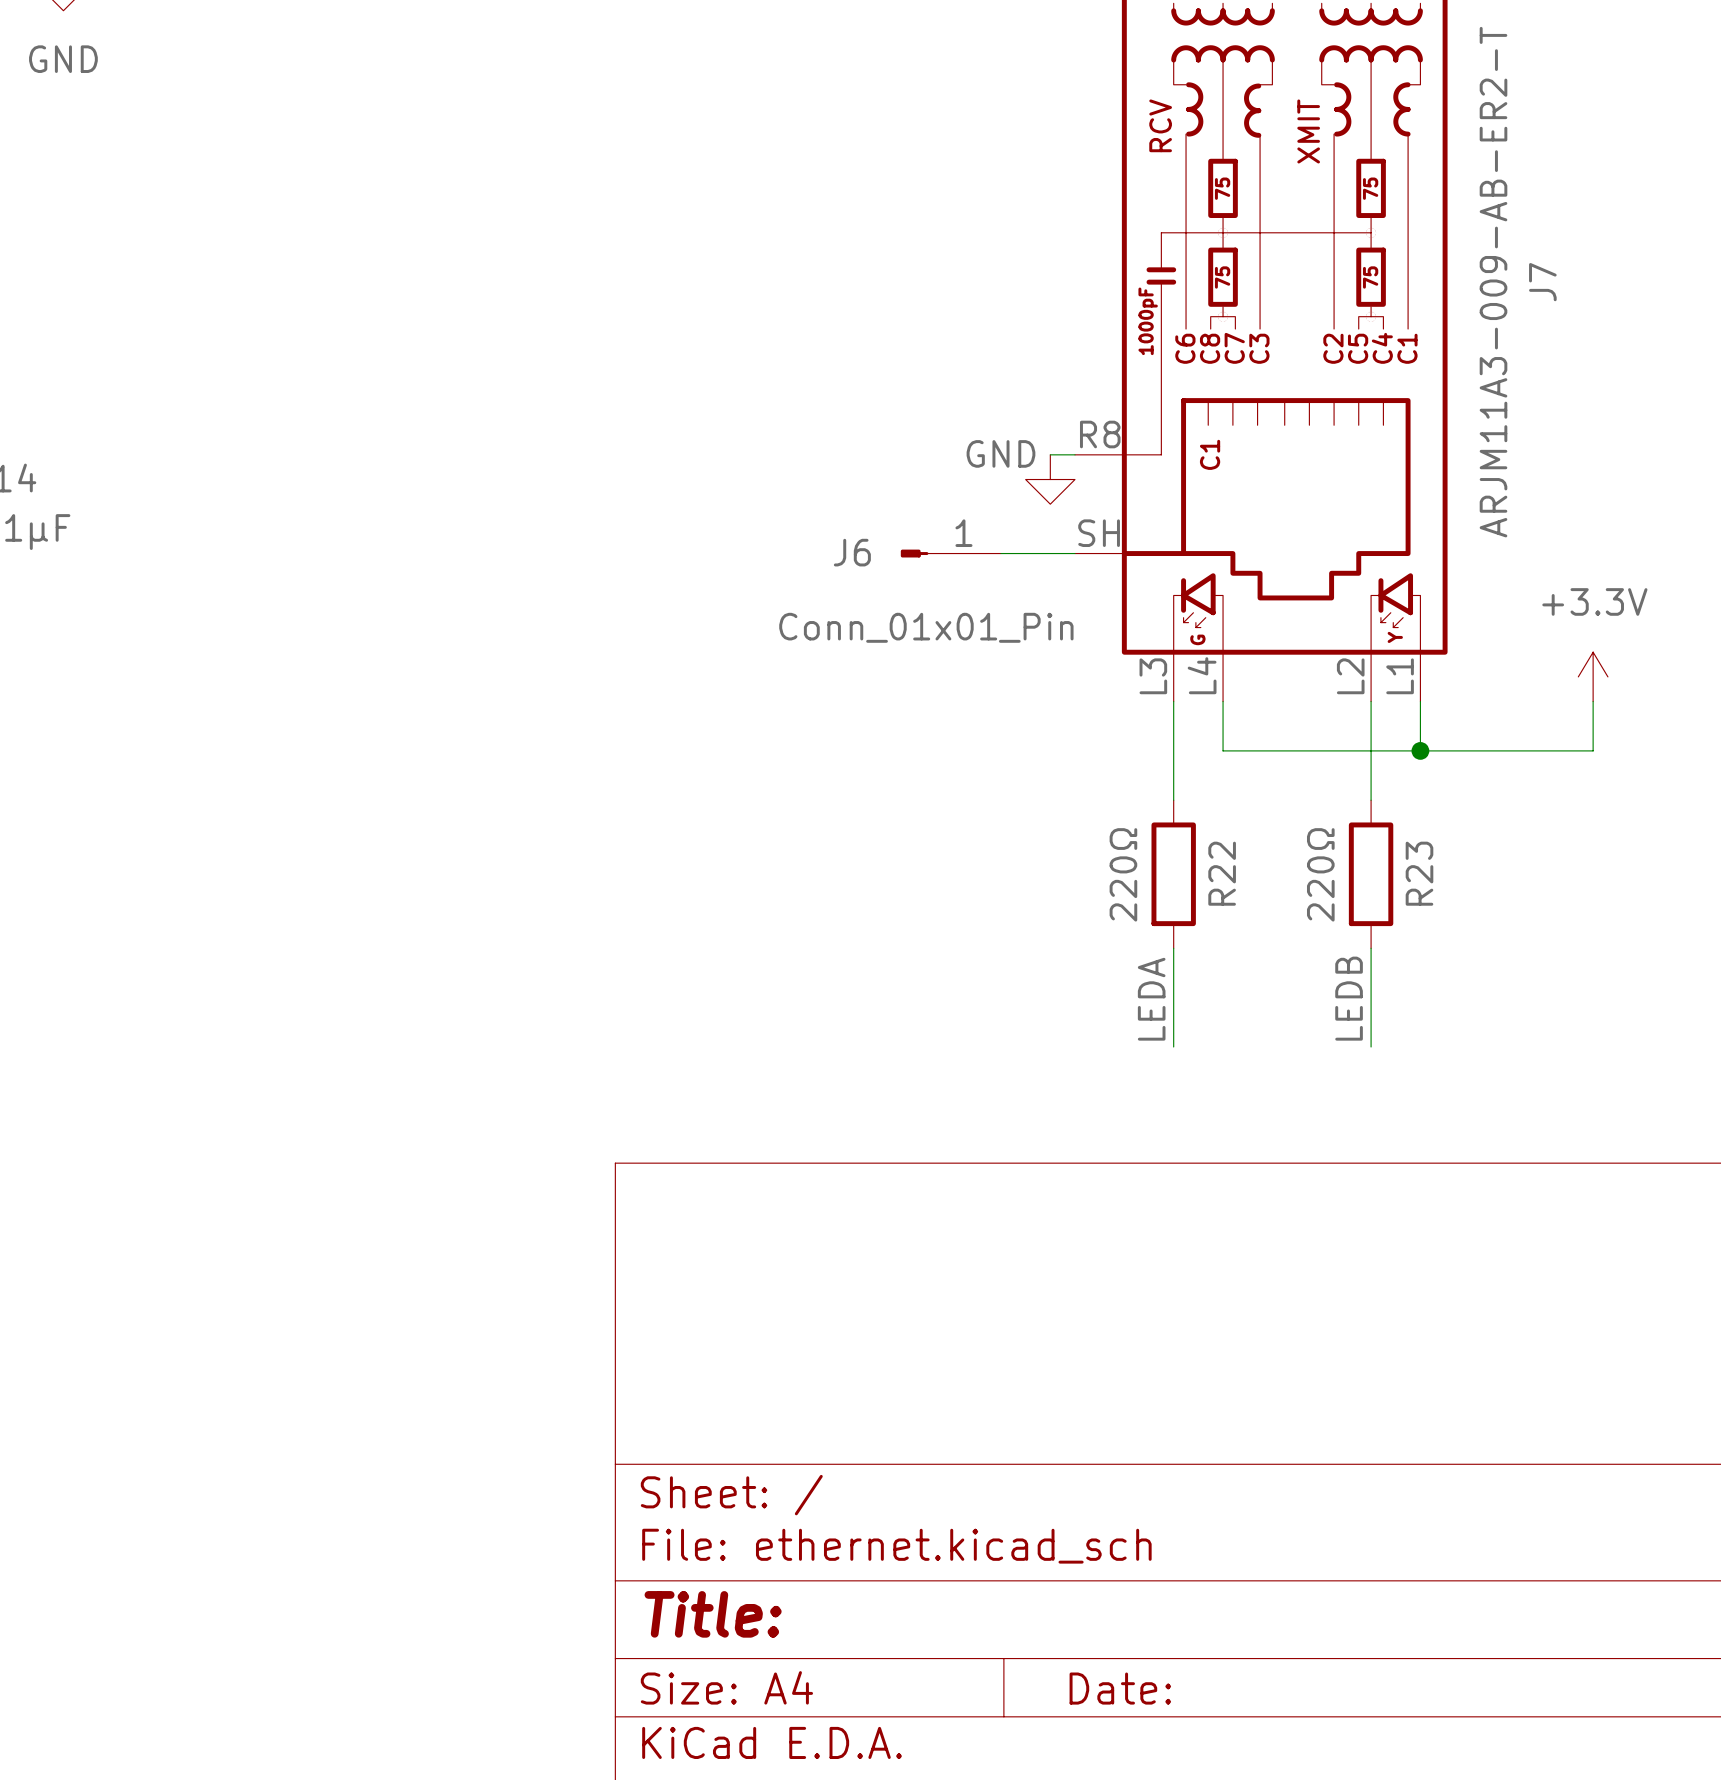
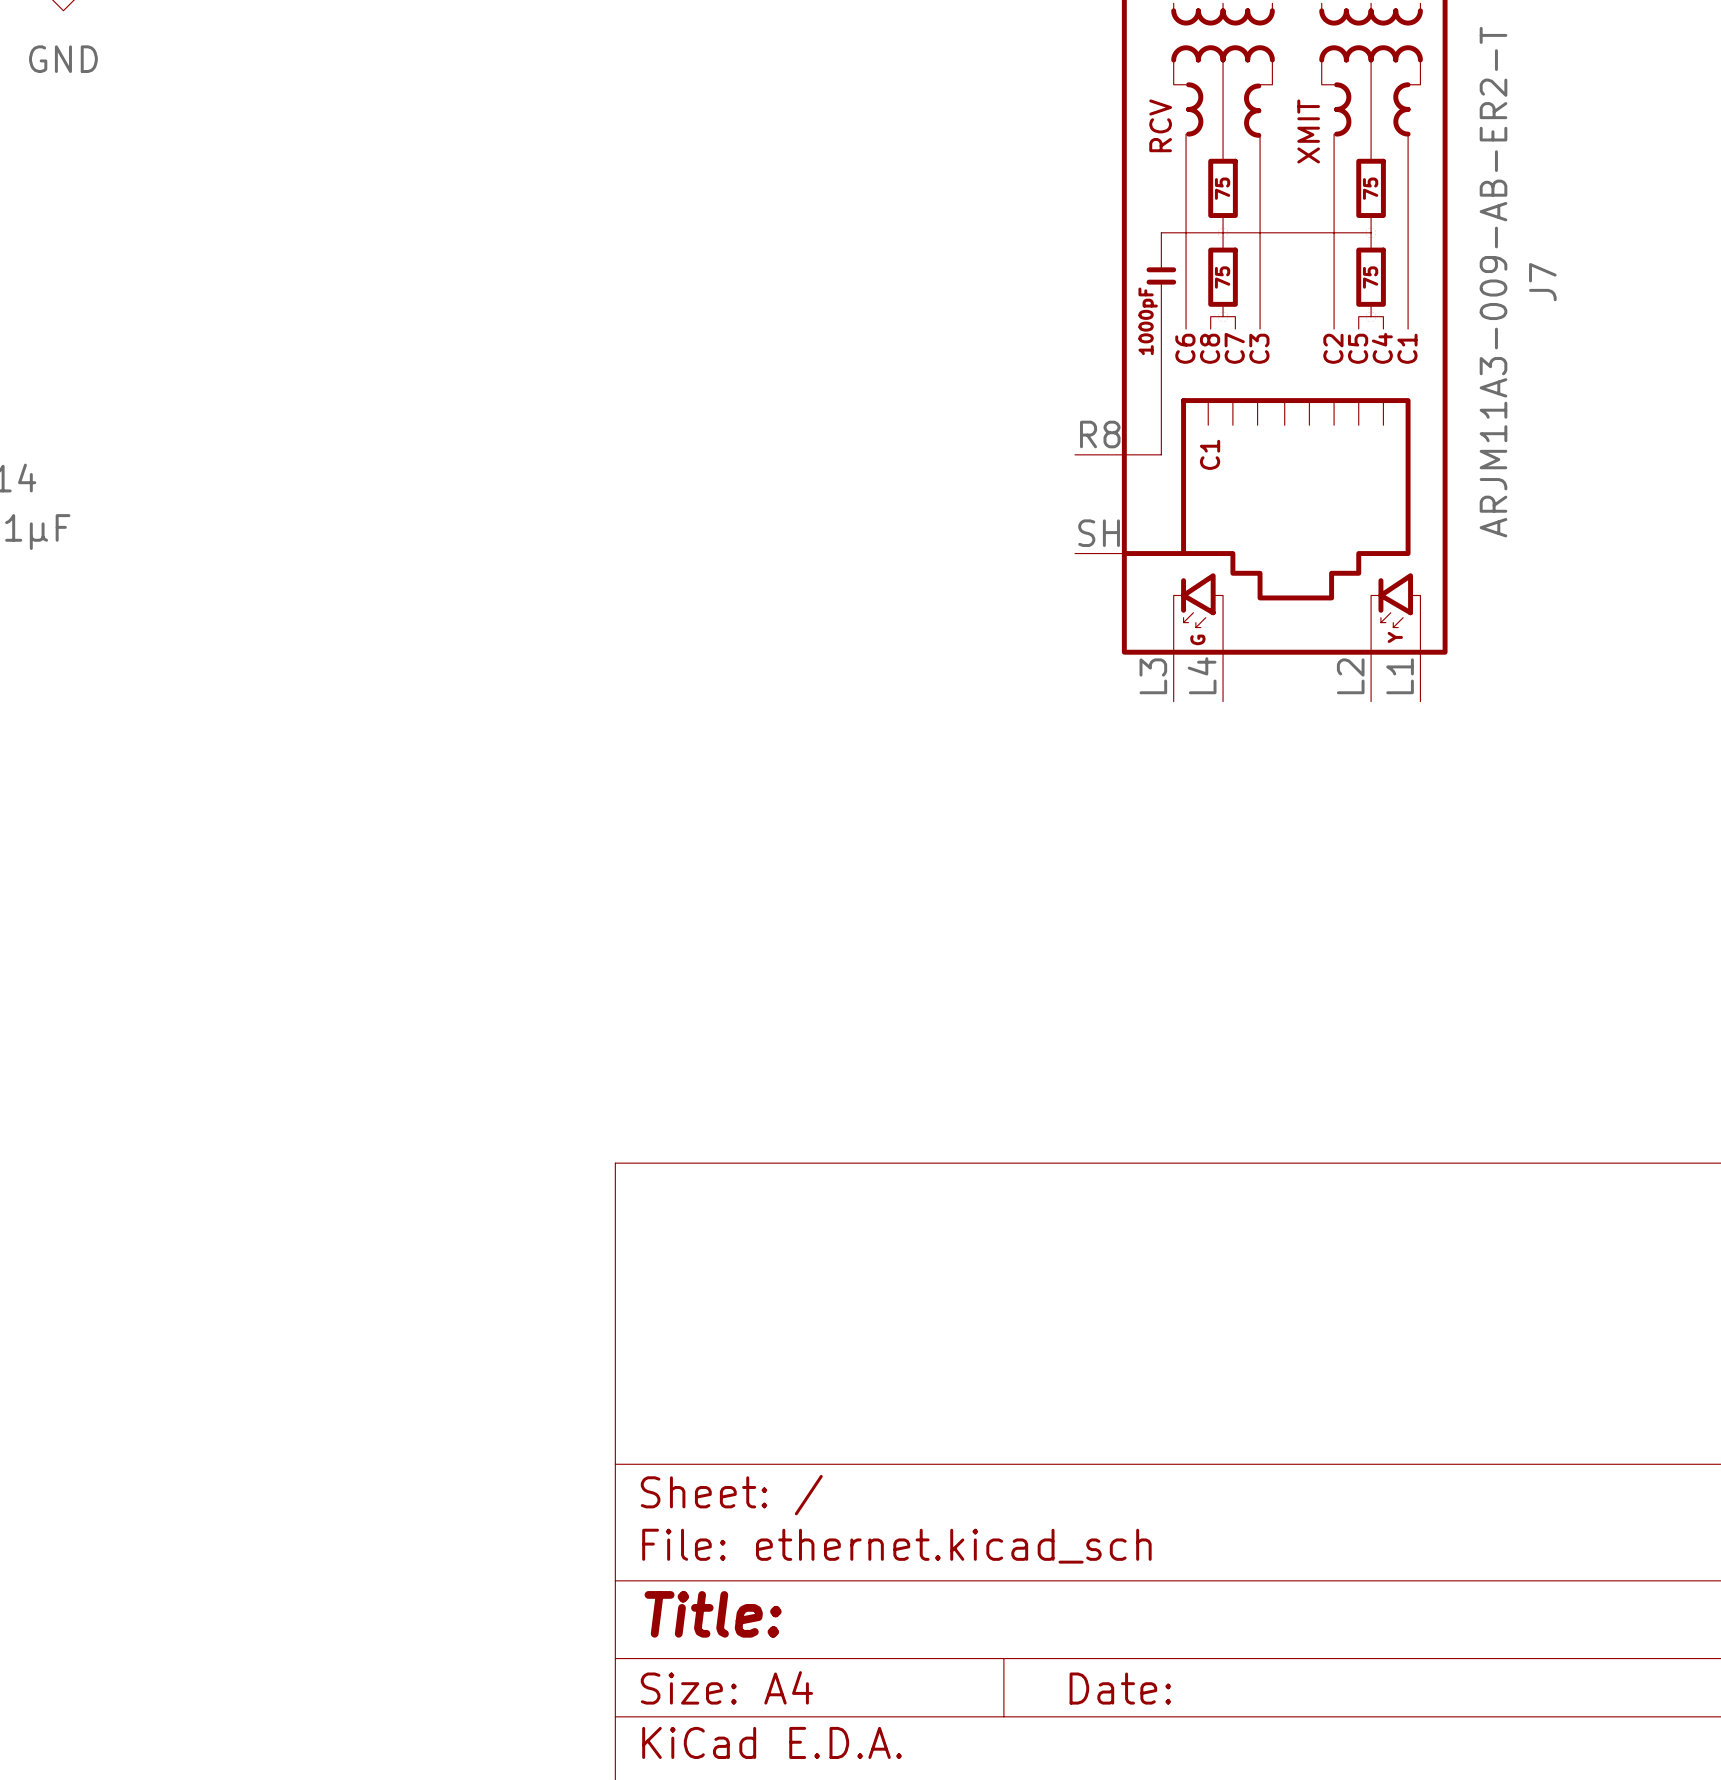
wire: (1050, 454) (1075, 454) -> none
power symbol: GND (1050, 479) -> none
J6: Conn_01x01_Pin (950, 553) -> none
wire: (1000, 553) (1075, 553) -> none
power symbol: +3.3V (1593, 676) -> none
wire: (1173, 701) (1173, 800) -> none
wire: (1223, 701) (1223, 750) (1593, 750) (1593, 701) -> none
wire: (1371, 701) (1371, 800) -> none
wire: (1420, 701) (1420, 750) -> none
junction: (1420, 750) -> none
R22: 220Ω (1173, 874) -> none
R23: 220Ω (1371, 874) -> none
wire: (1173, 948) (1173, 1046) -> none
wire: (1371, 948) (1371, 1046) -> none
label: LEDB (1349, 998) -> none
label: LEDA (1151, 999) -> none

